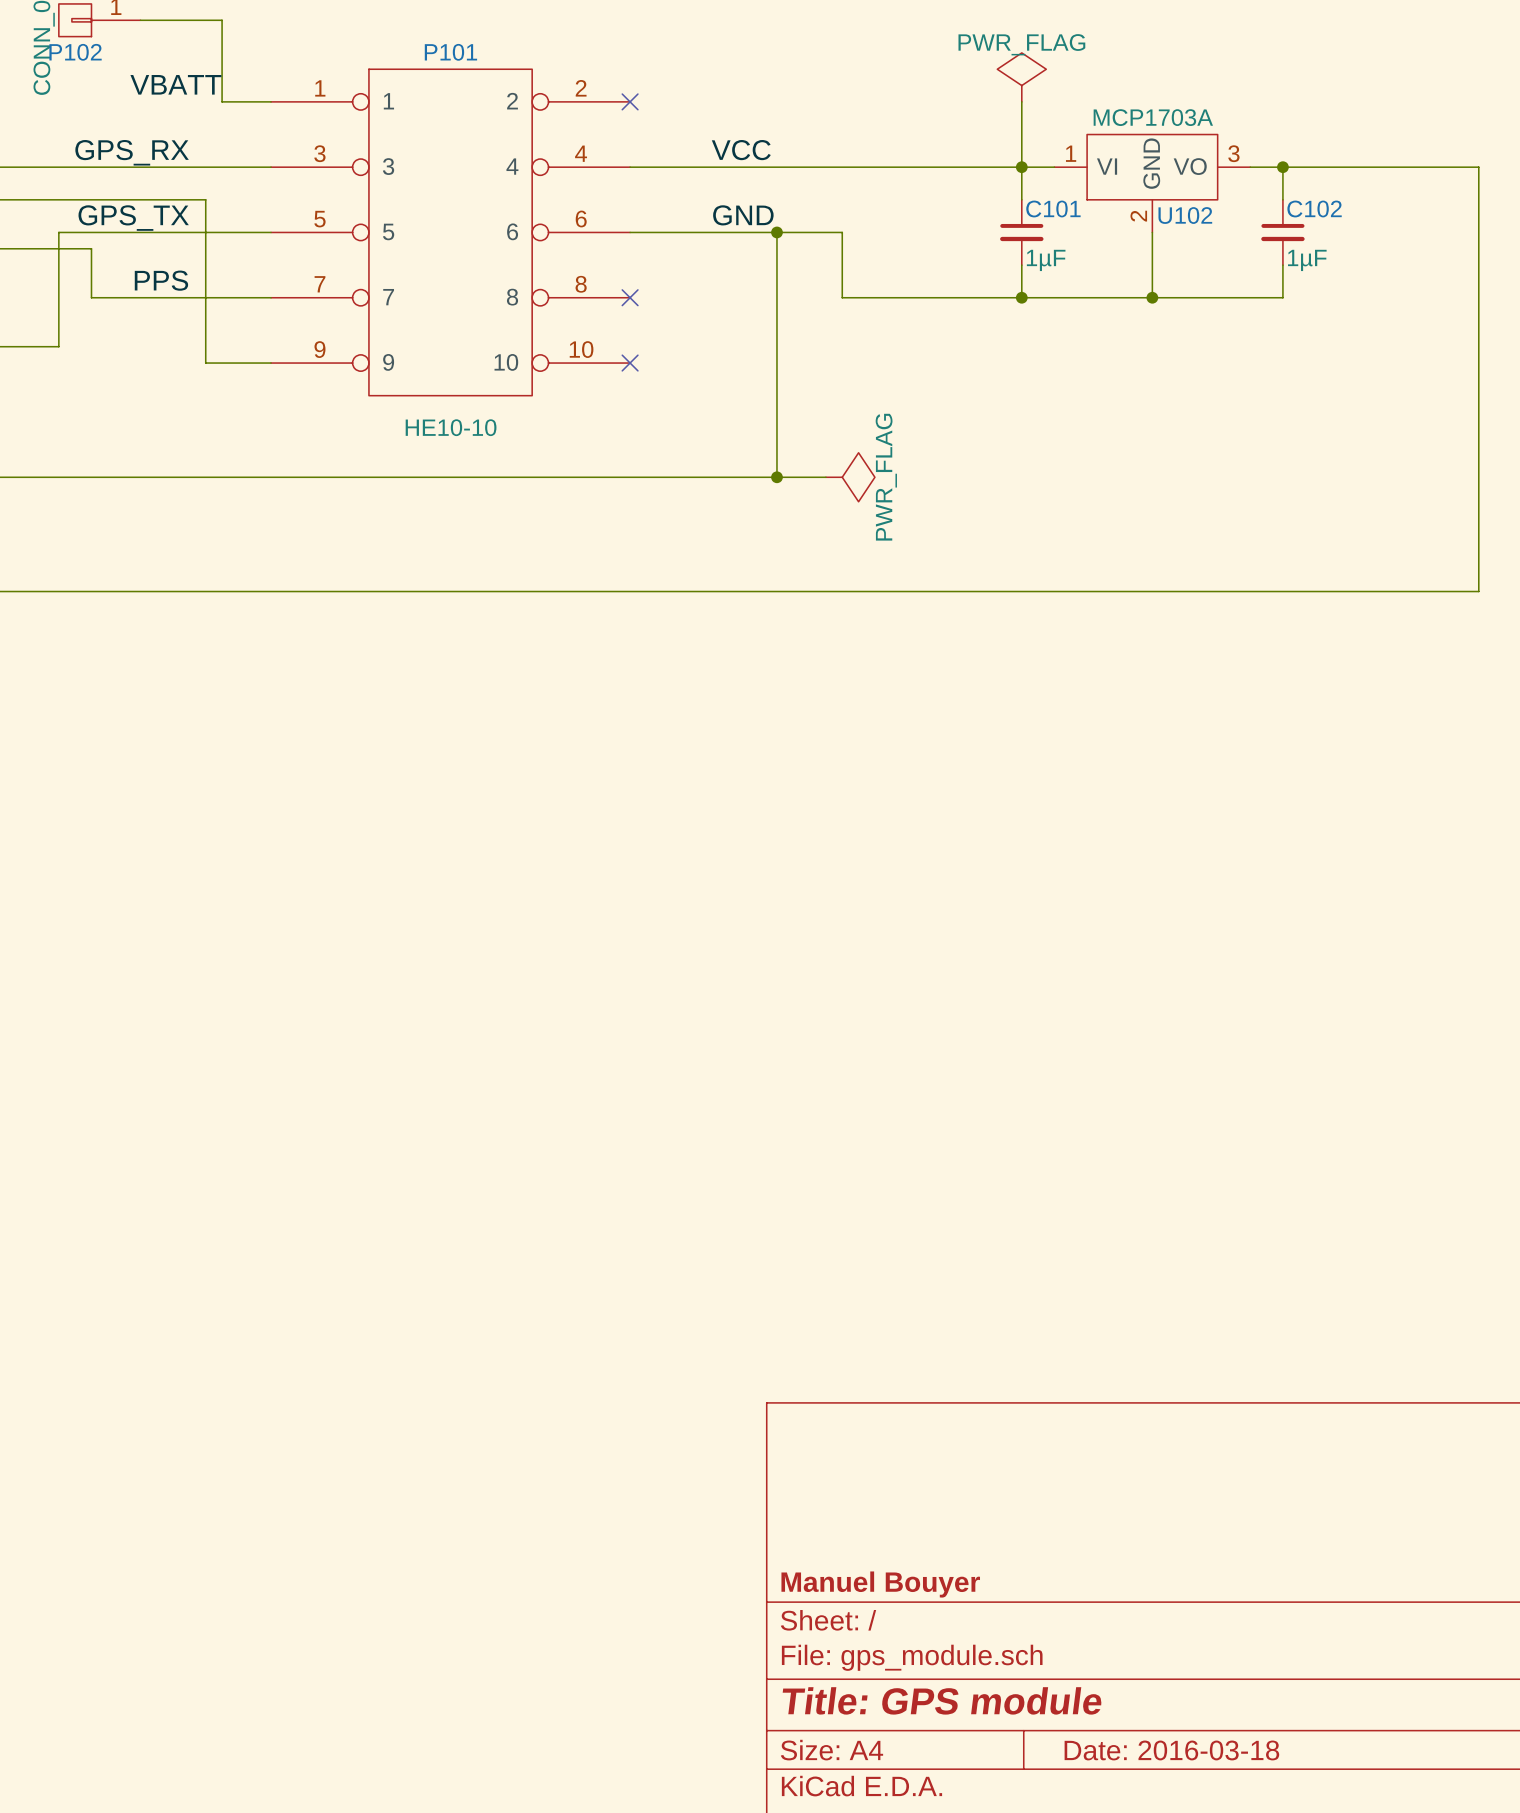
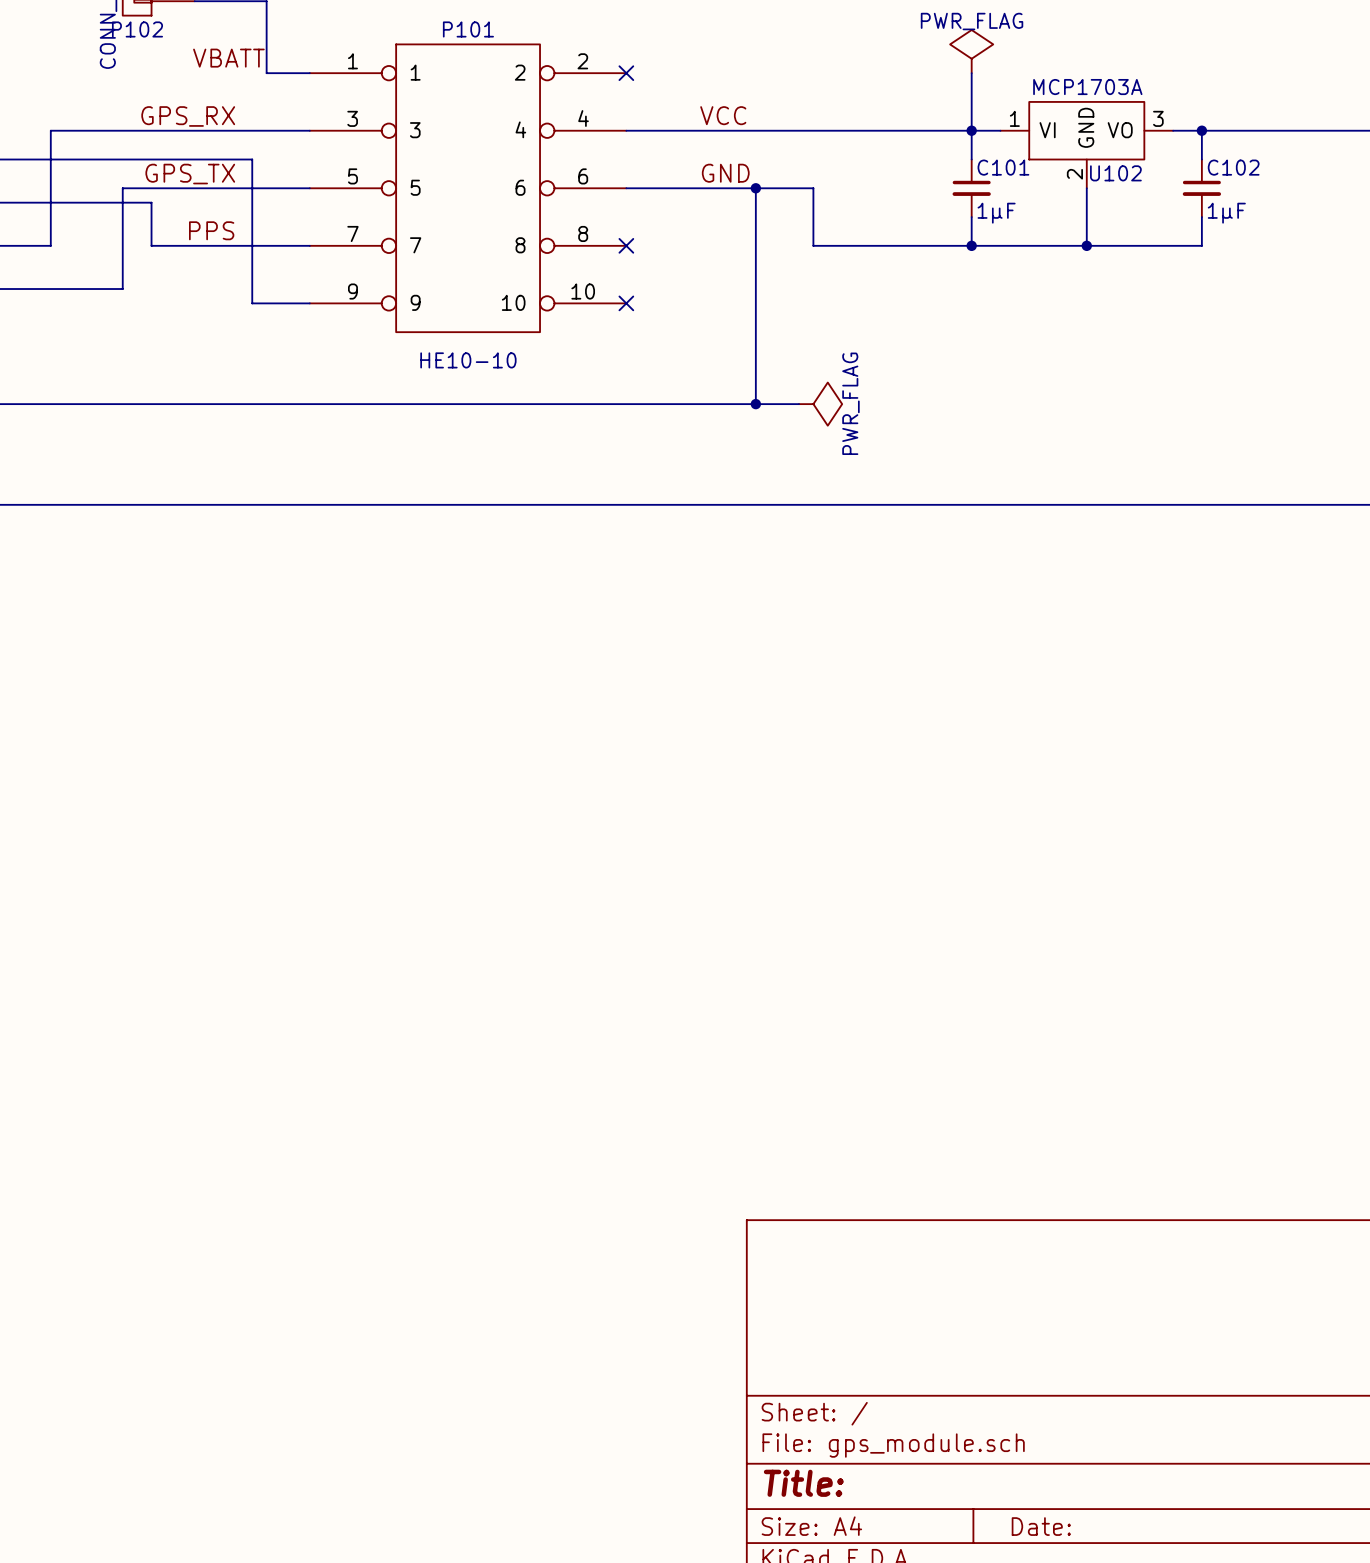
title block: Manuel Bouyer (880, 1584) -> none
title block: Title: GPS module (942, 1700) -> Title: (803, 1483)
title block: Date: 2016-03-18 (1171, 1750) -> Date: (1041, 1526)

